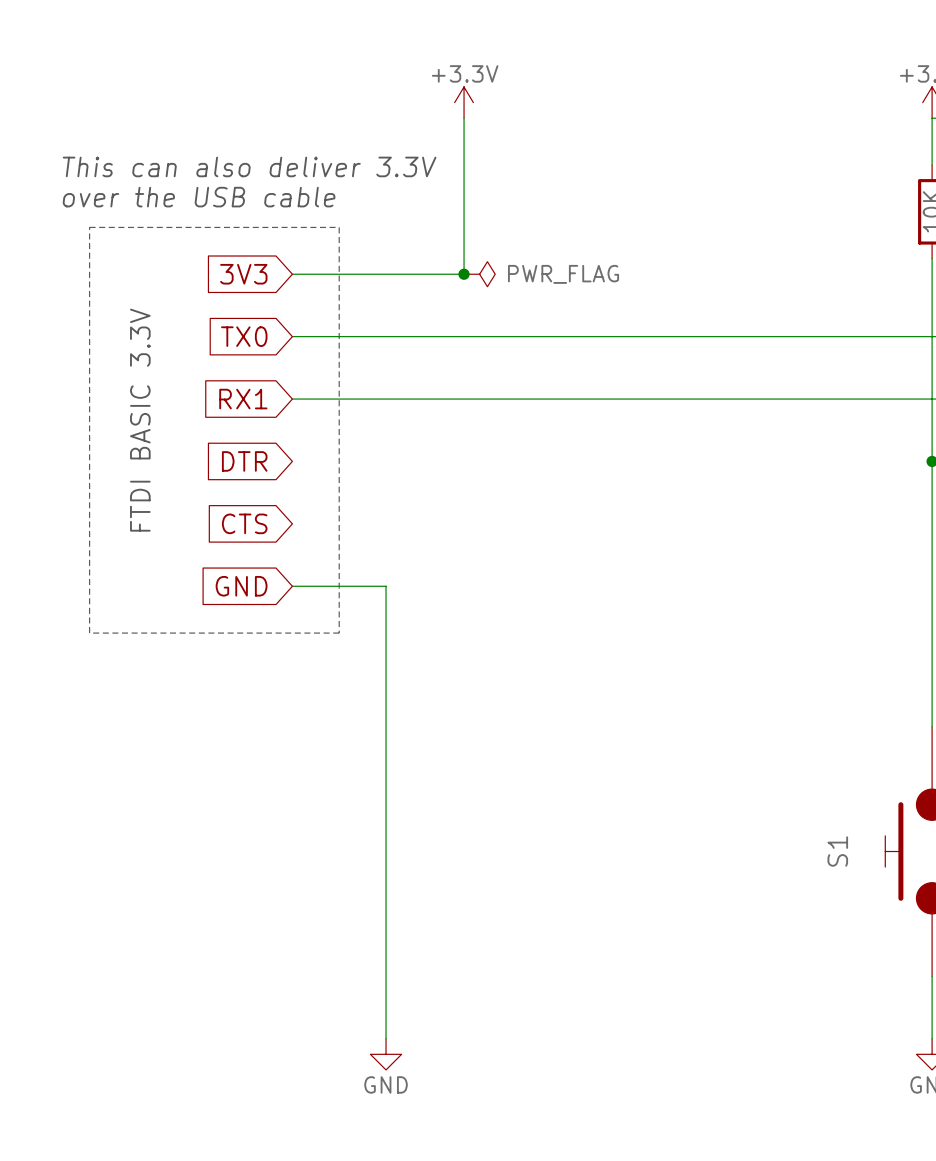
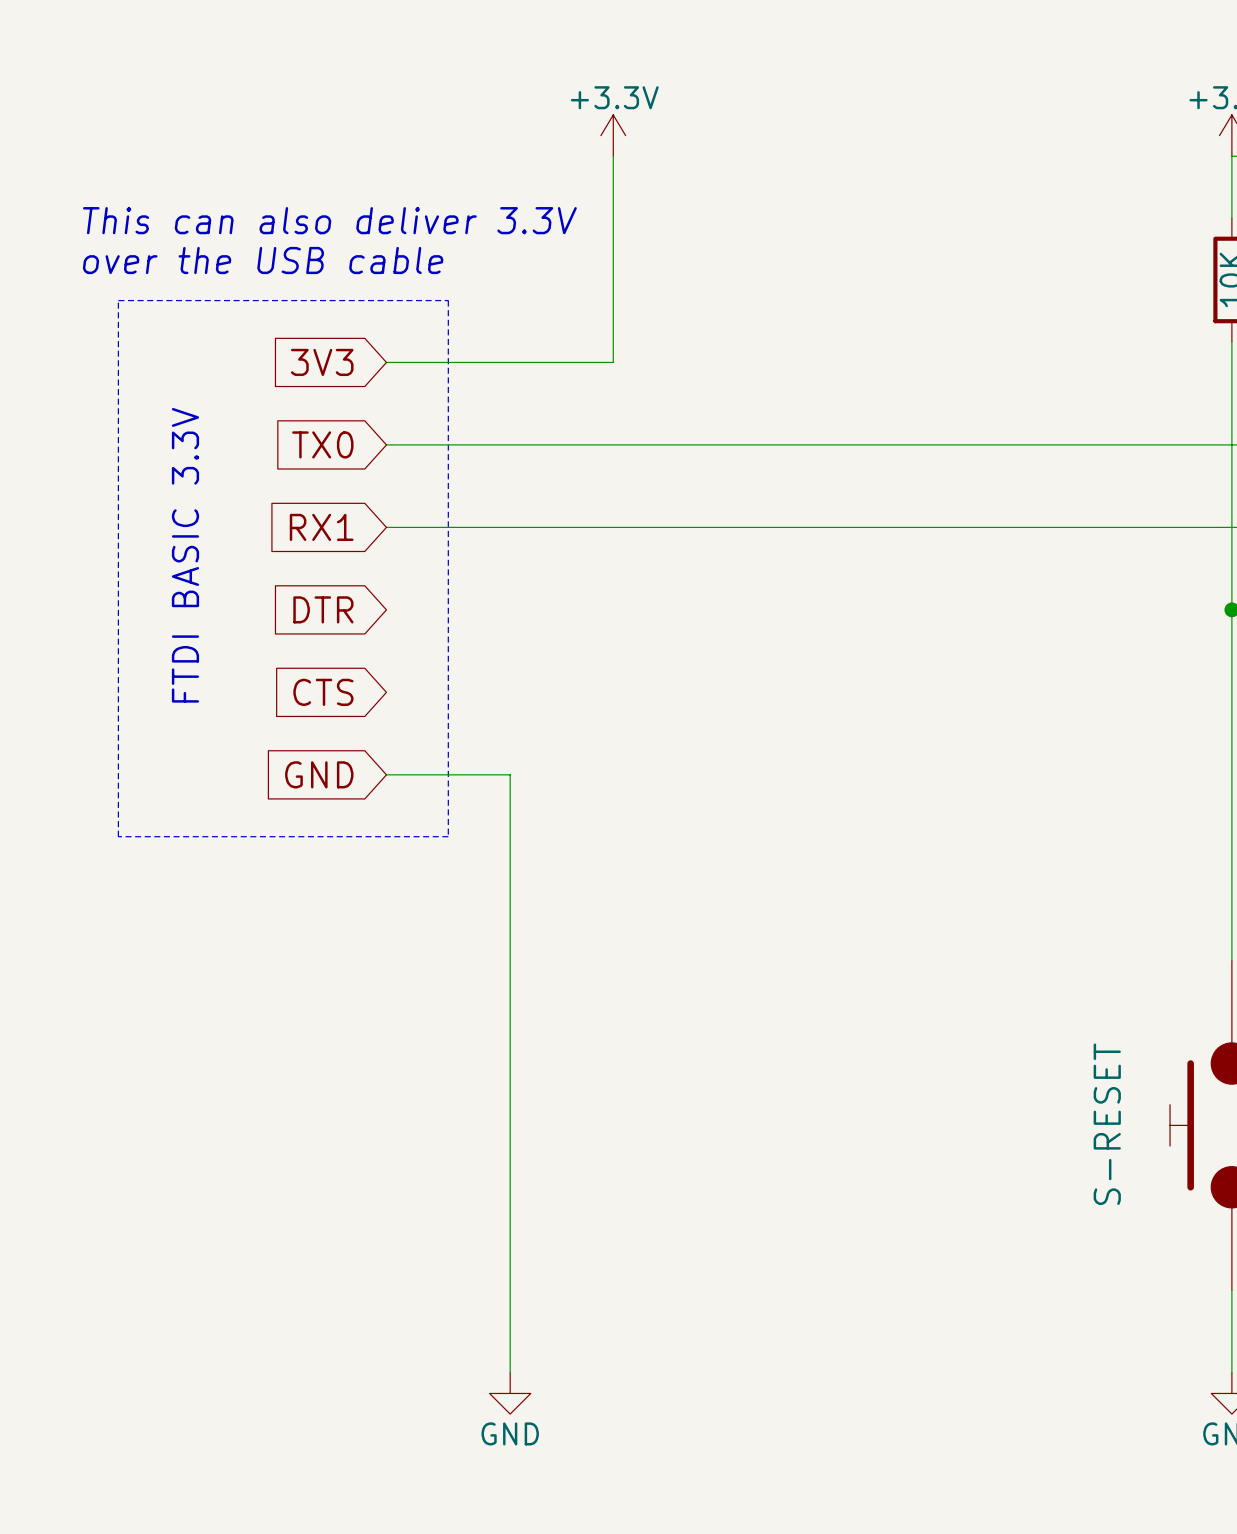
junction: (464, 274) -> none
power symbol: PWR_FLAG (479, 274) -> none
S1 name: S1 (837, 851) -> S-RESET (1107, 1124)

